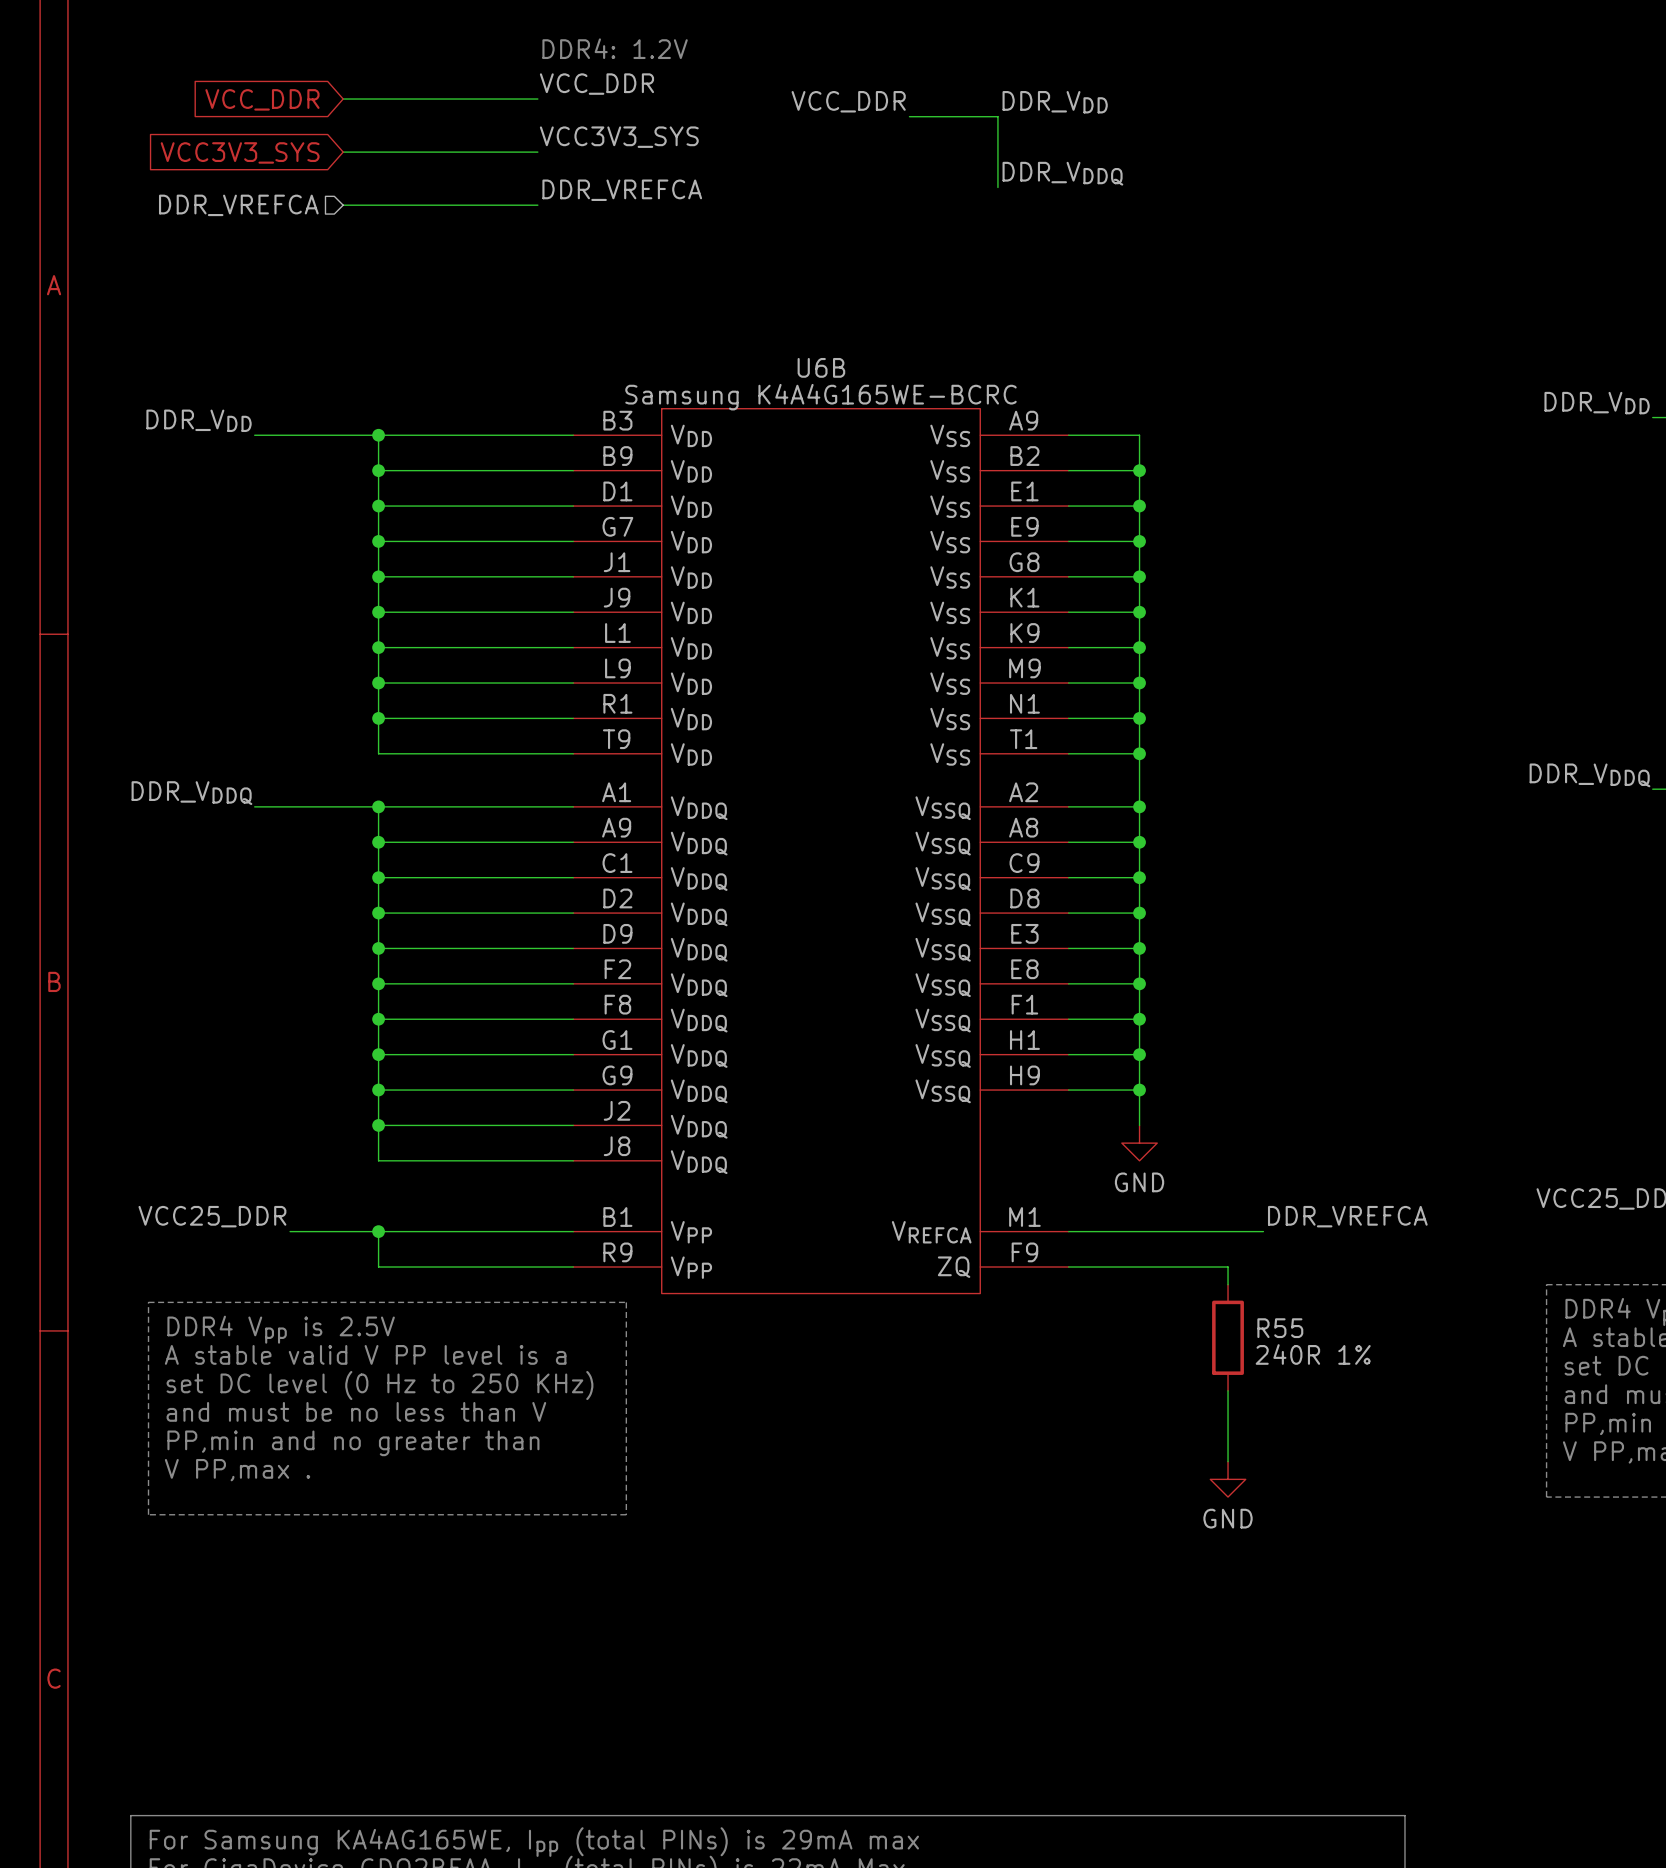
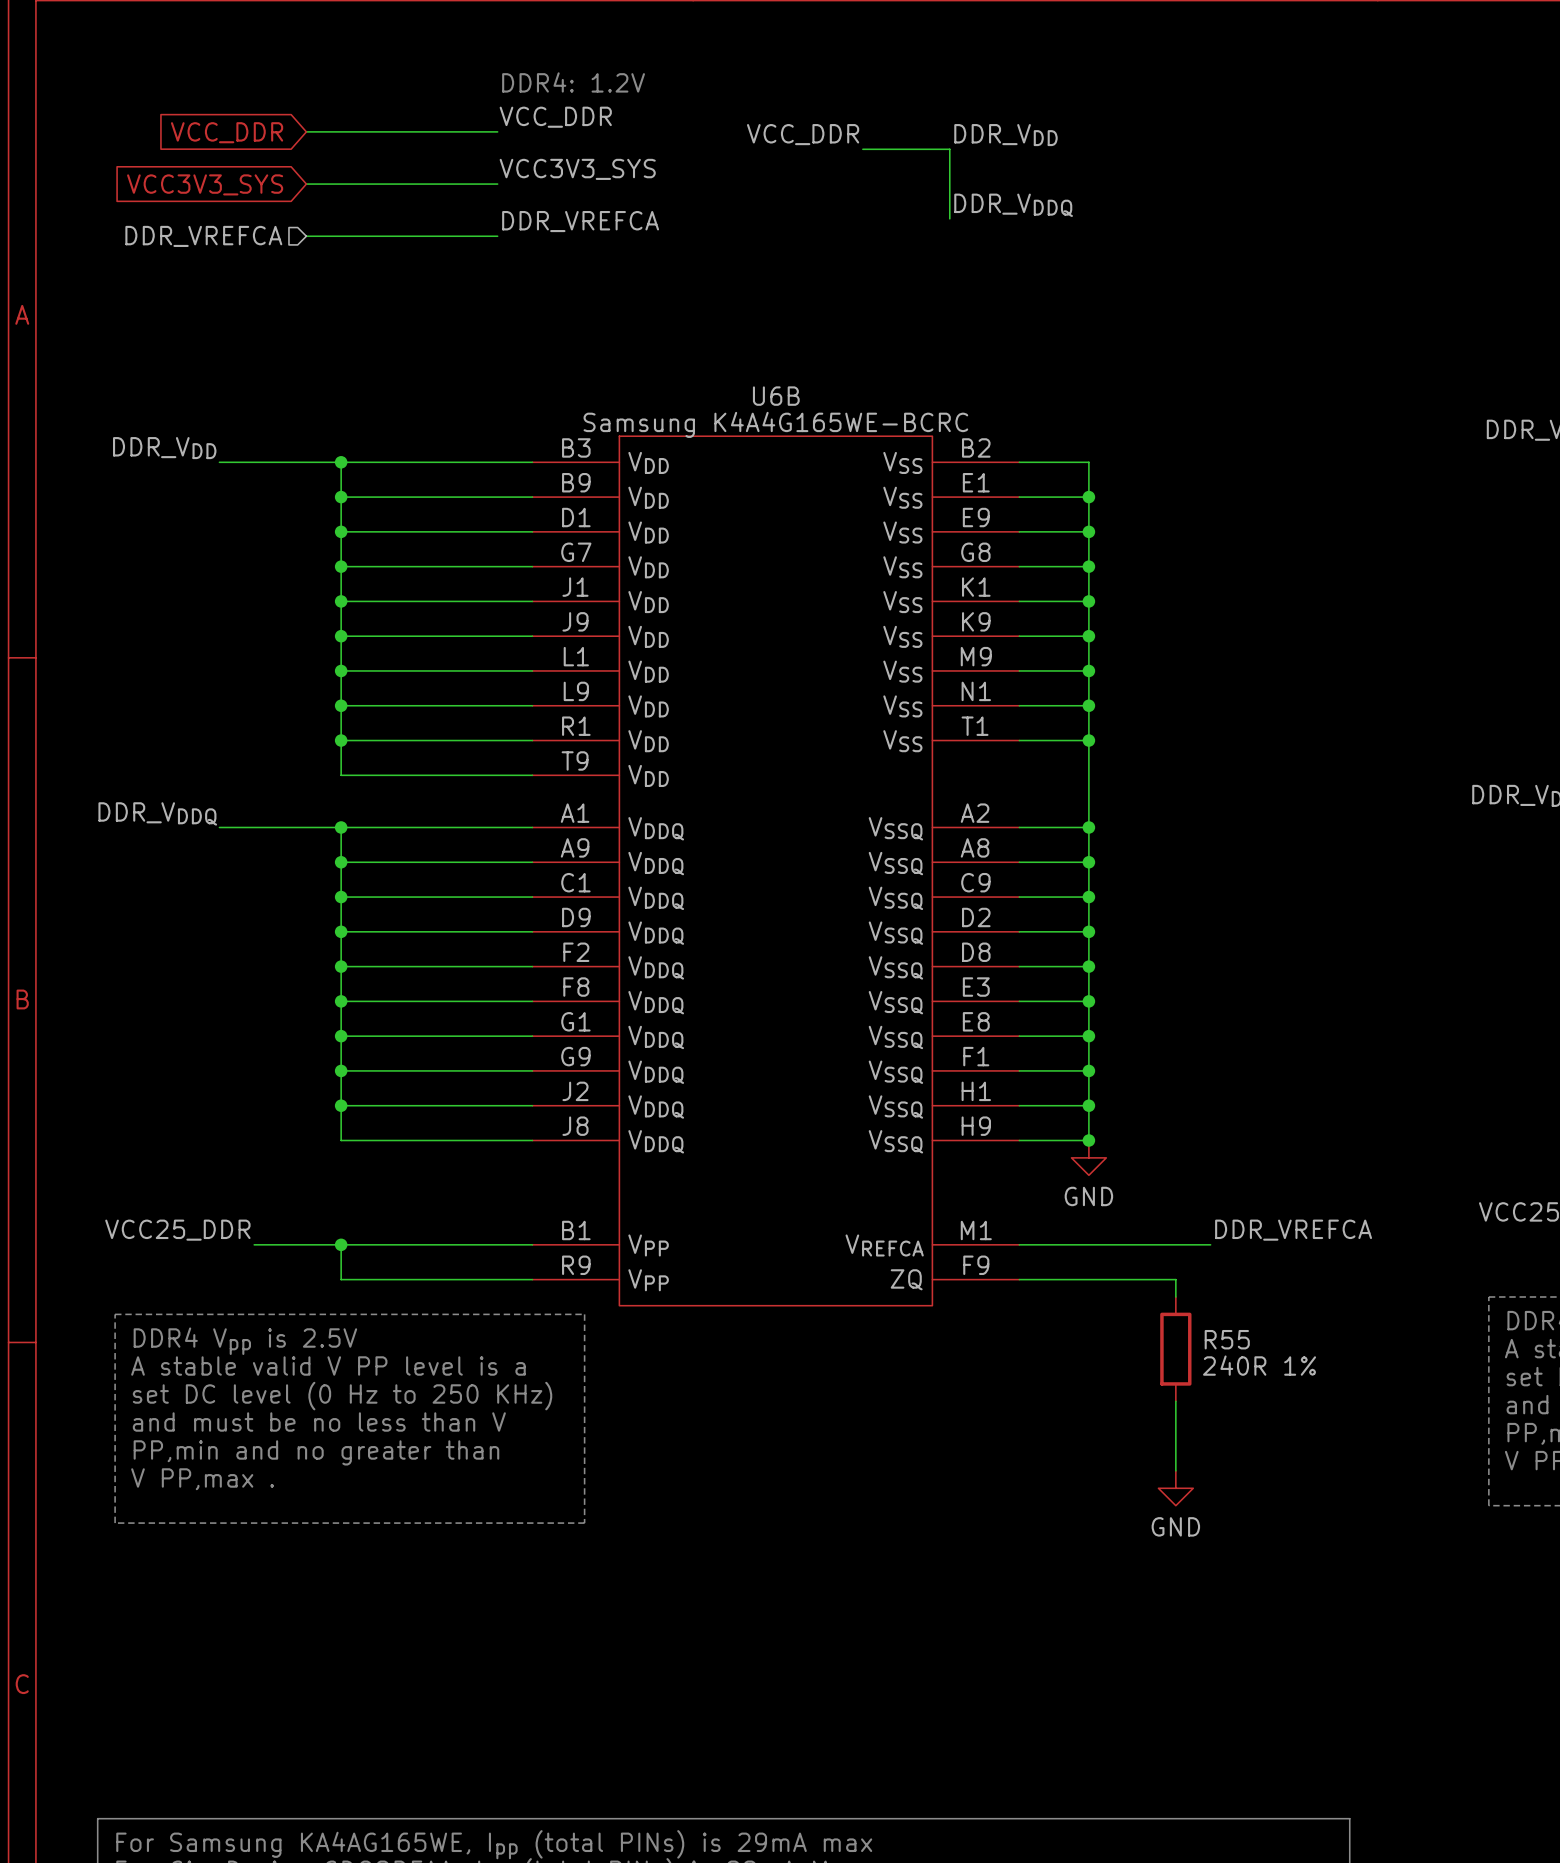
U6B symbol: [573, 408, 1069, 1294] -> [532, 436, 1020, 1306]
wire: (1068, 753) (1139, 753) -> none
junction: (1139, 753) -> none
wire: (378, 1125) (378, 1160) (573, 1160) -> none
junction: (378, 1125) -> none
wire: none -> (1019, 1140) (1088, 1140)
junction: none -> (1088, 1140)

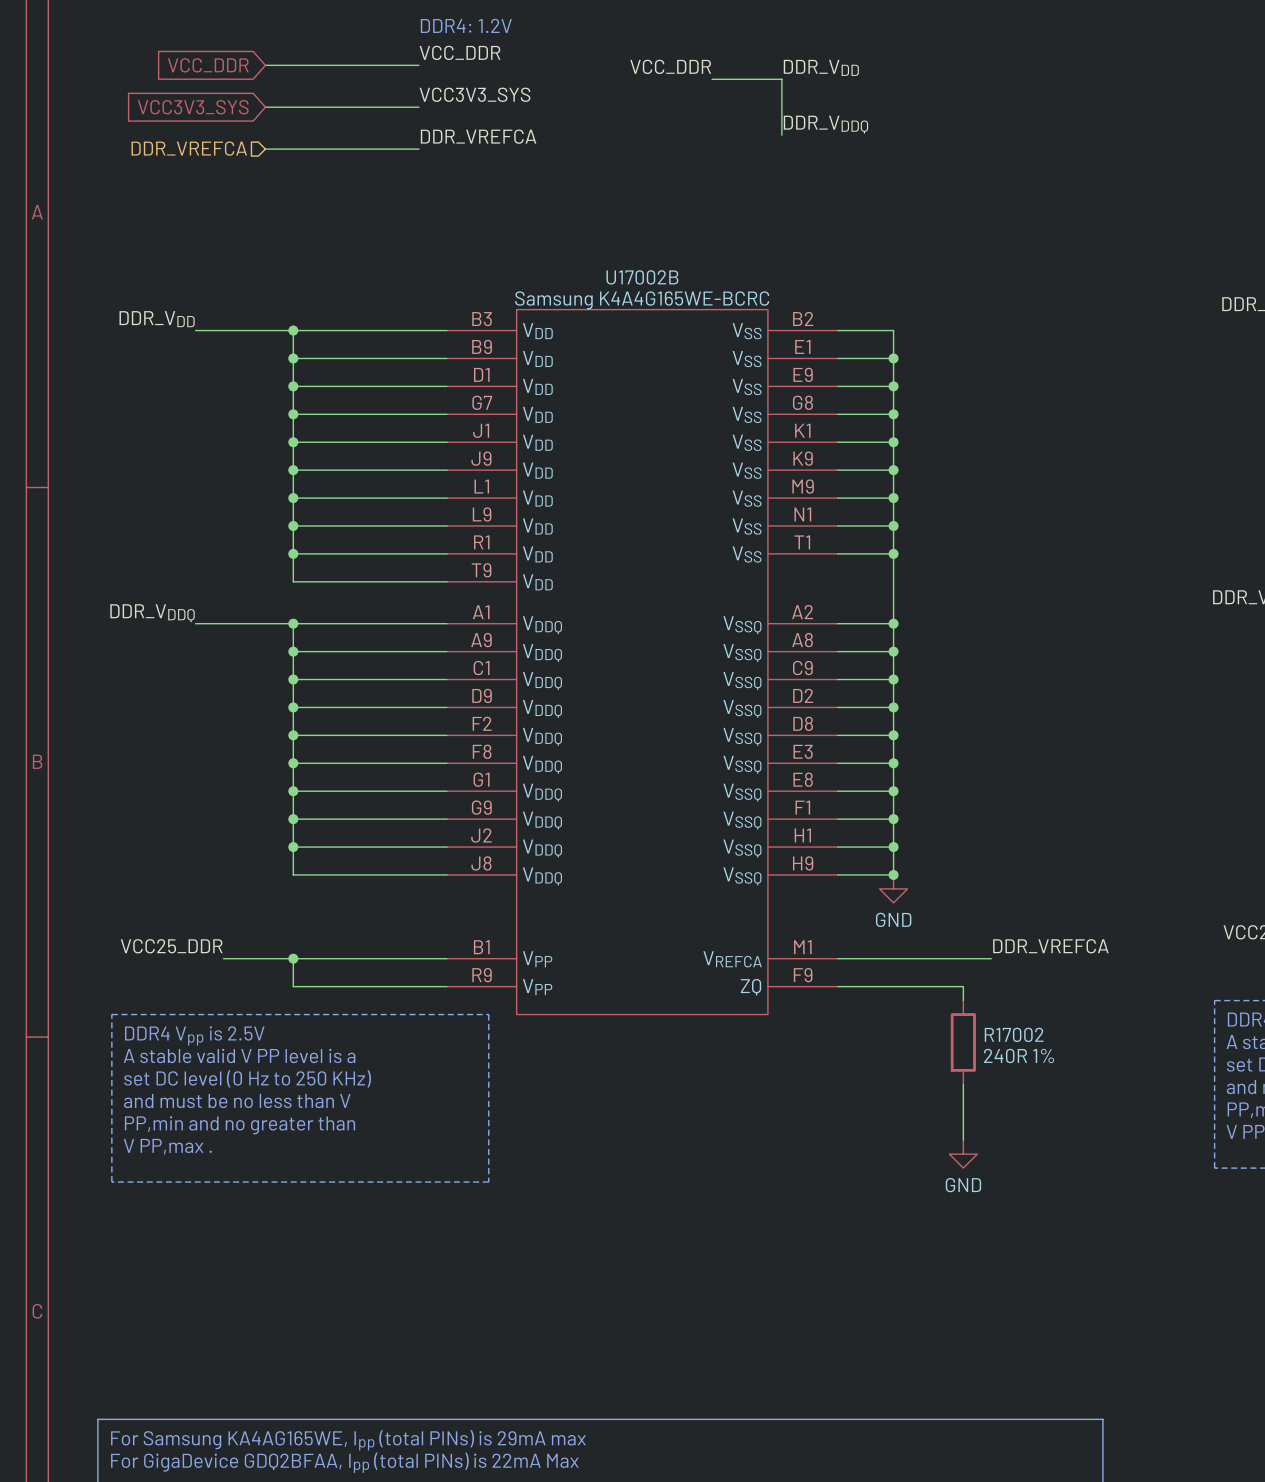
U6B: Samsung K4A4G165WE-BCRC (775, 870) -> none
U17002B: none -> Samsung K4A4G165WE-BCRC (642, 662)
R55 name: R55 (1227, 1339) -> R17002 (1014, 1034)

